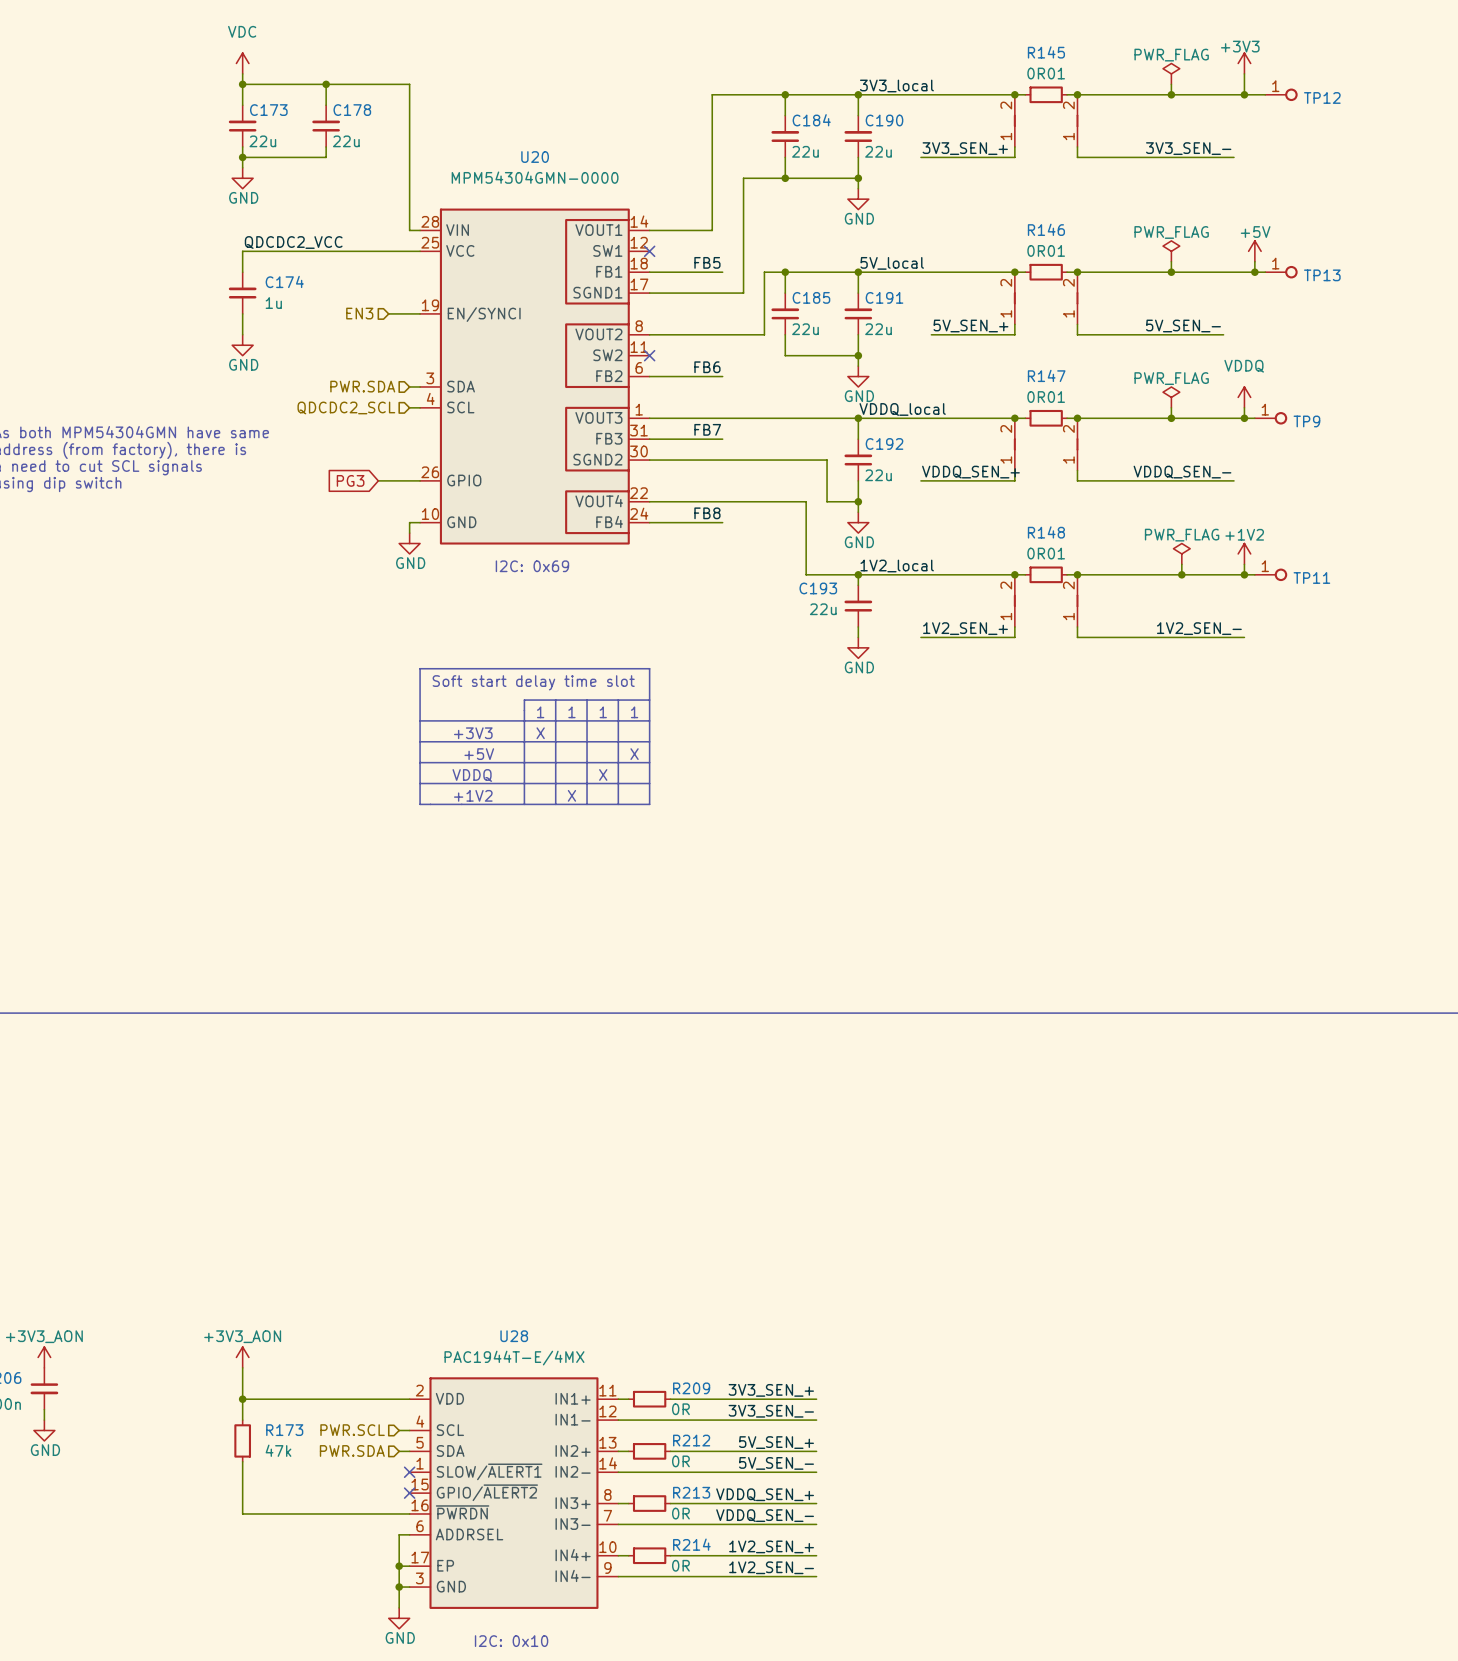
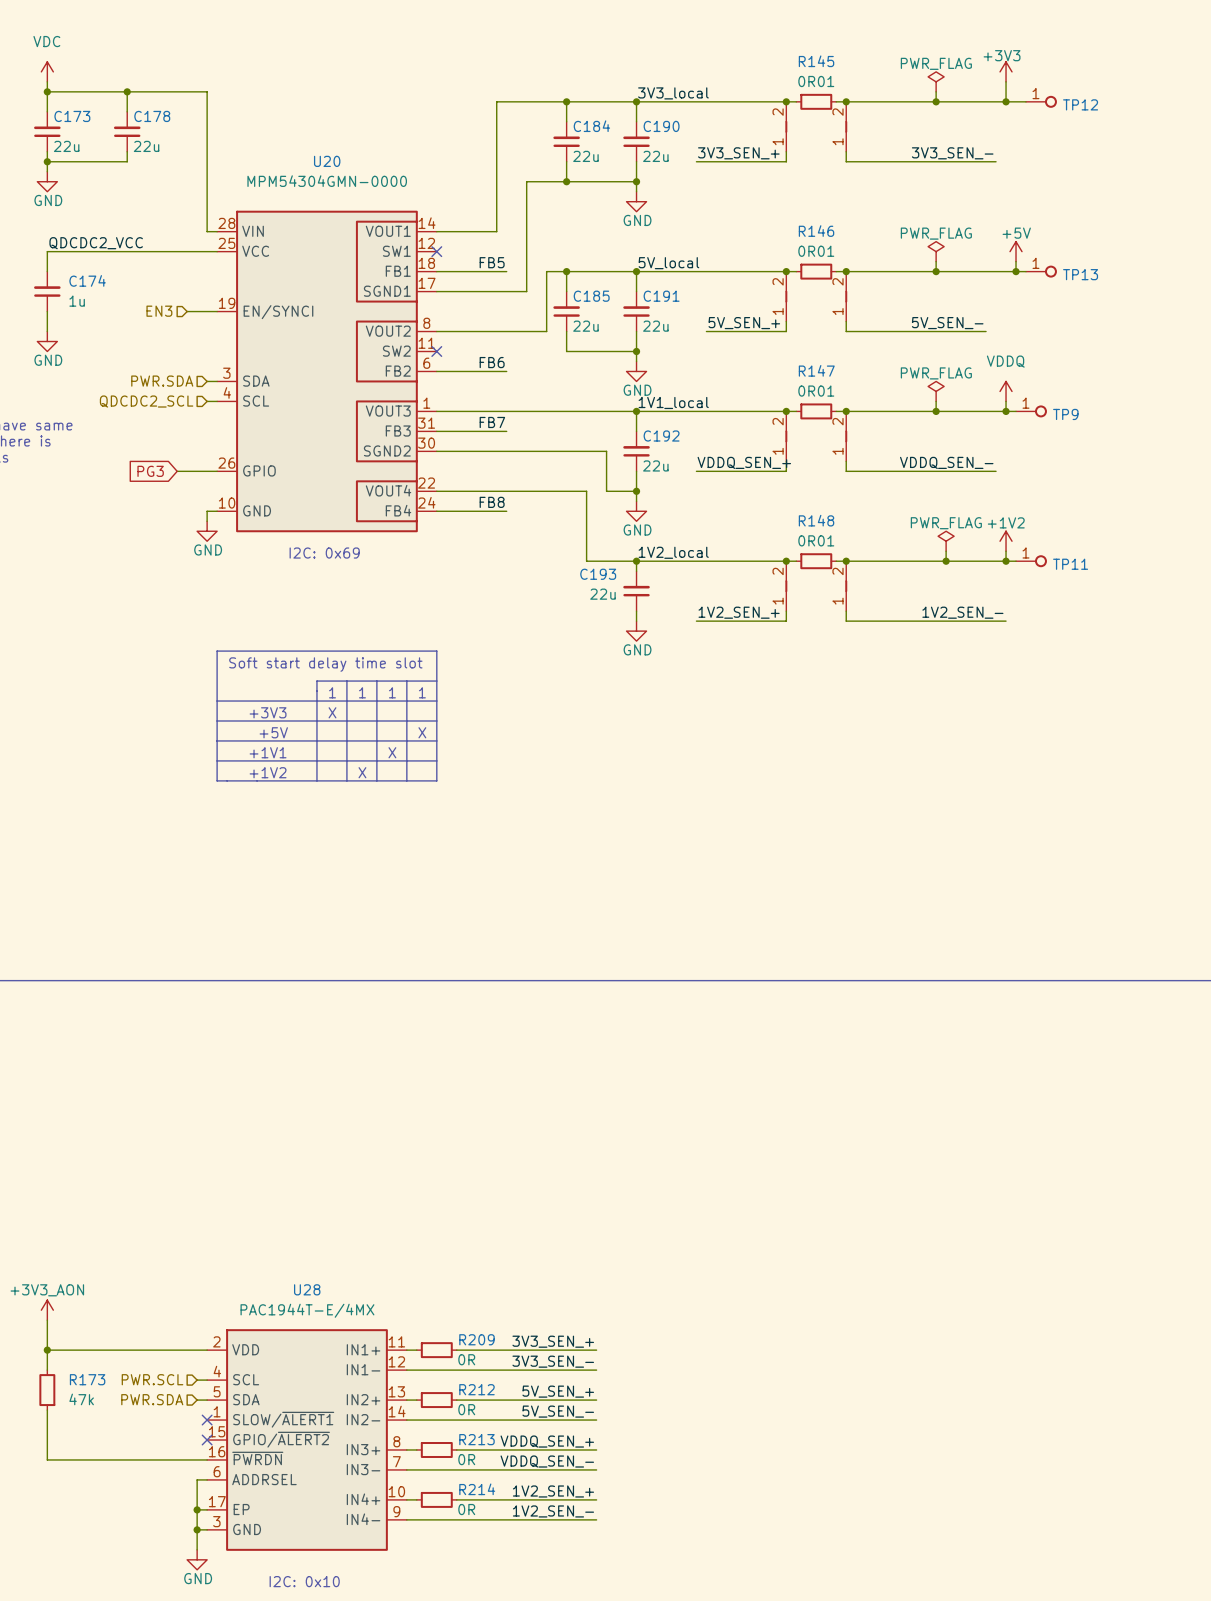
label: VDDQ_local (902, 409) -> 1V1_local (673, 402)
text: VDDQ (472, 775) -> +1V1 (268, 752)

